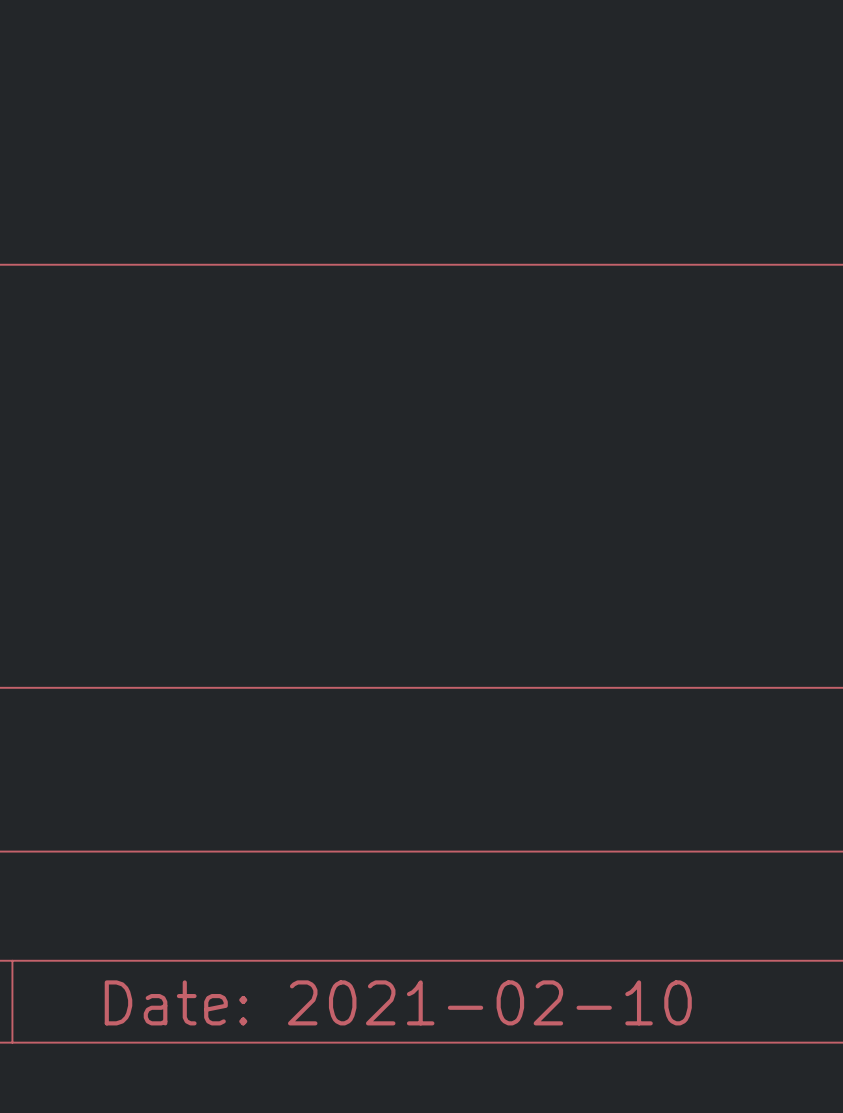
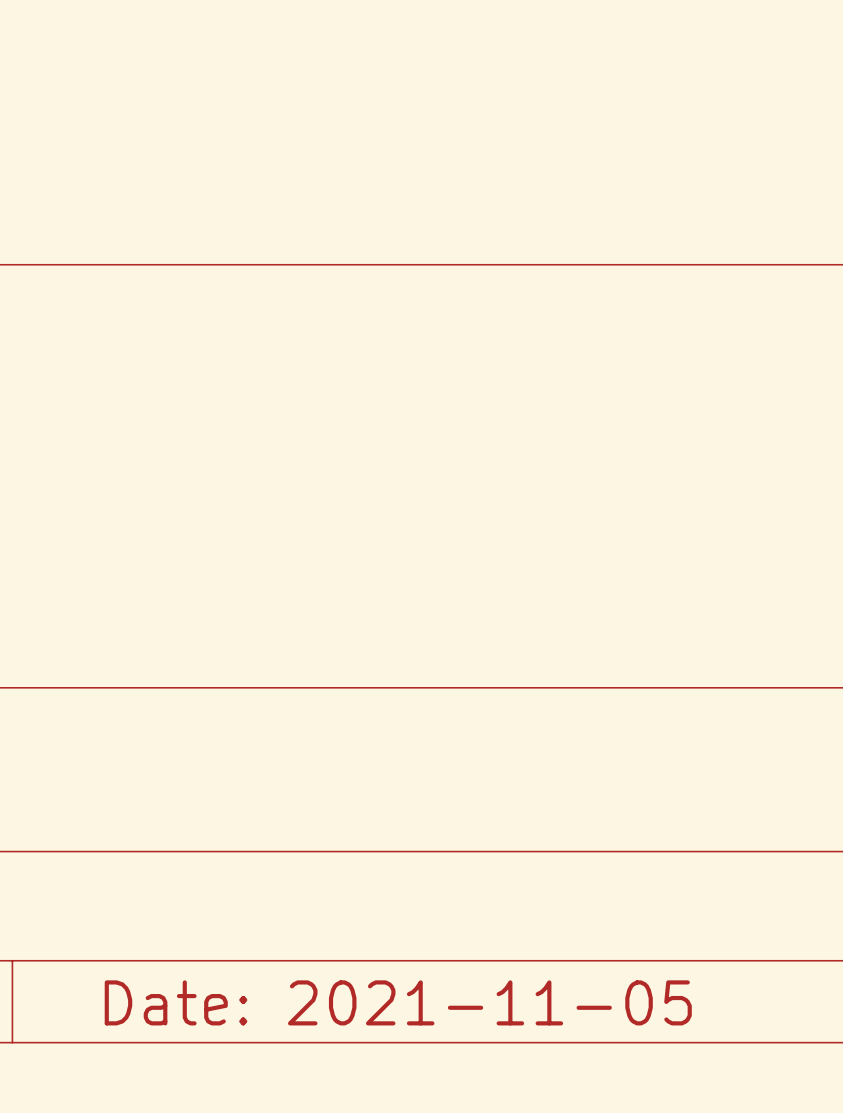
title block: Date: 2021-02-10 (398, 1002) -> Date: 2021-11-05 (398, 1002)

